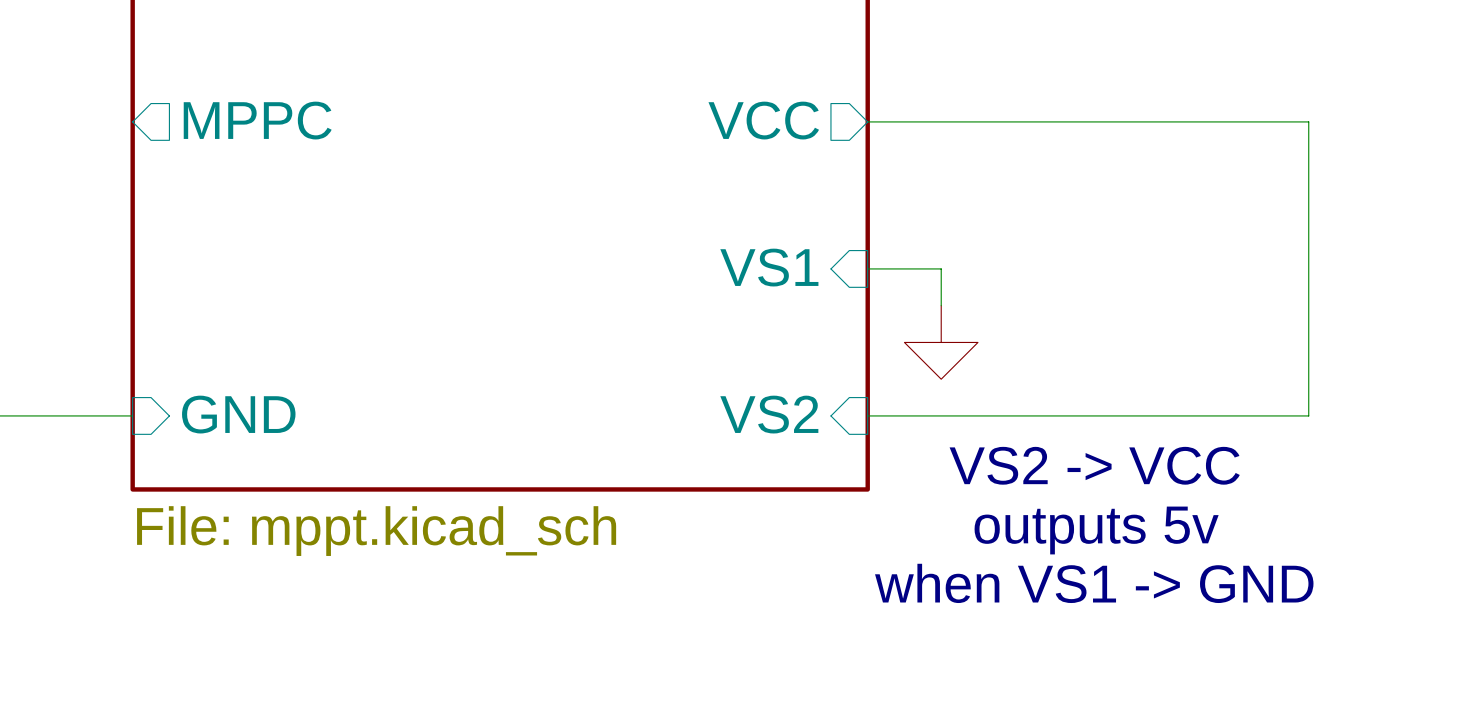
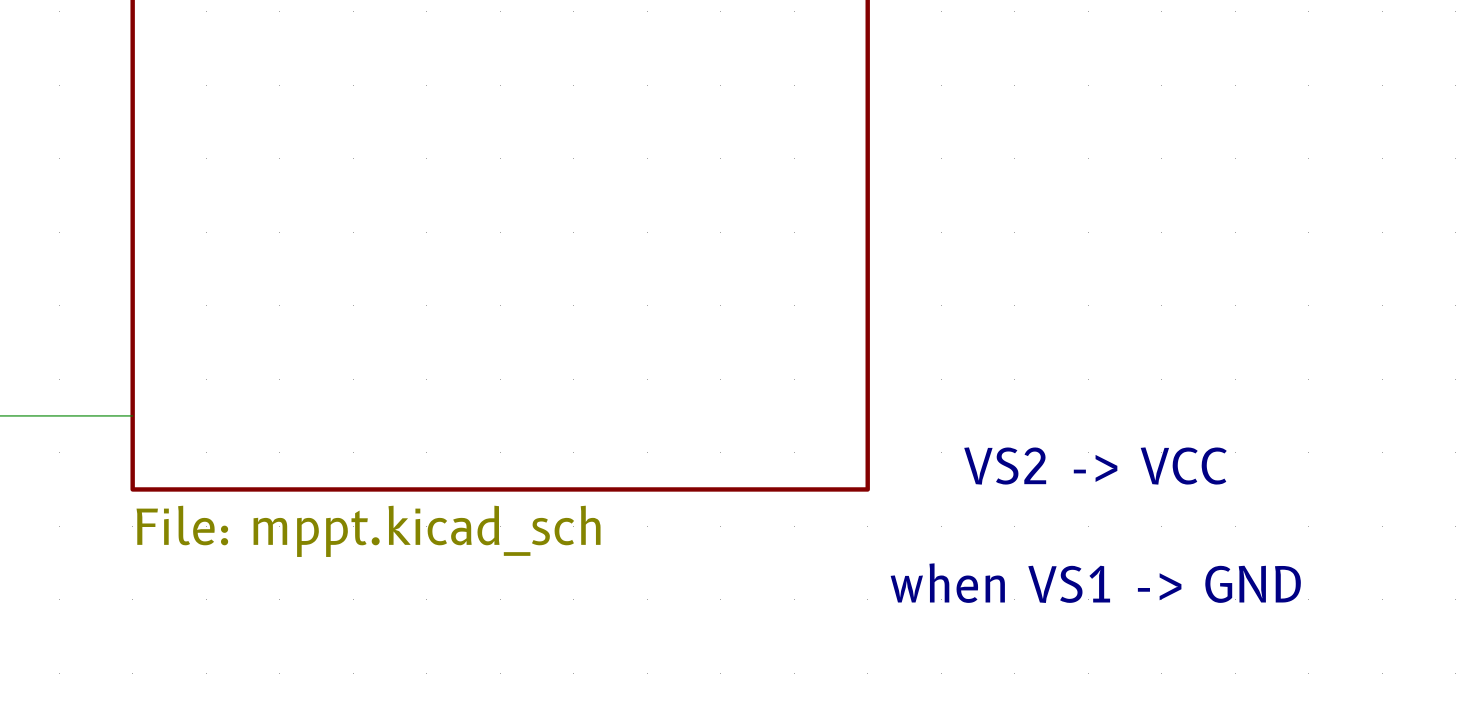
sheet pin: MPPC (257, 120) -> none
sheet pin: VCC (763, 120) -> none
wire: (867, 121) (1308, 121) (1308, 415) (867, 415) -> none
sheet pin: VS1 (769, 267) -> none
wire: (867, 268) (941, 268) (941, 305) -> none
power symbol: (941, 342) -> none
sheet pin: GND (238, 414) -> none
sheet pin: VS2 (769, 414) -> none
text: outputs 5v (1096, 530) -> none

